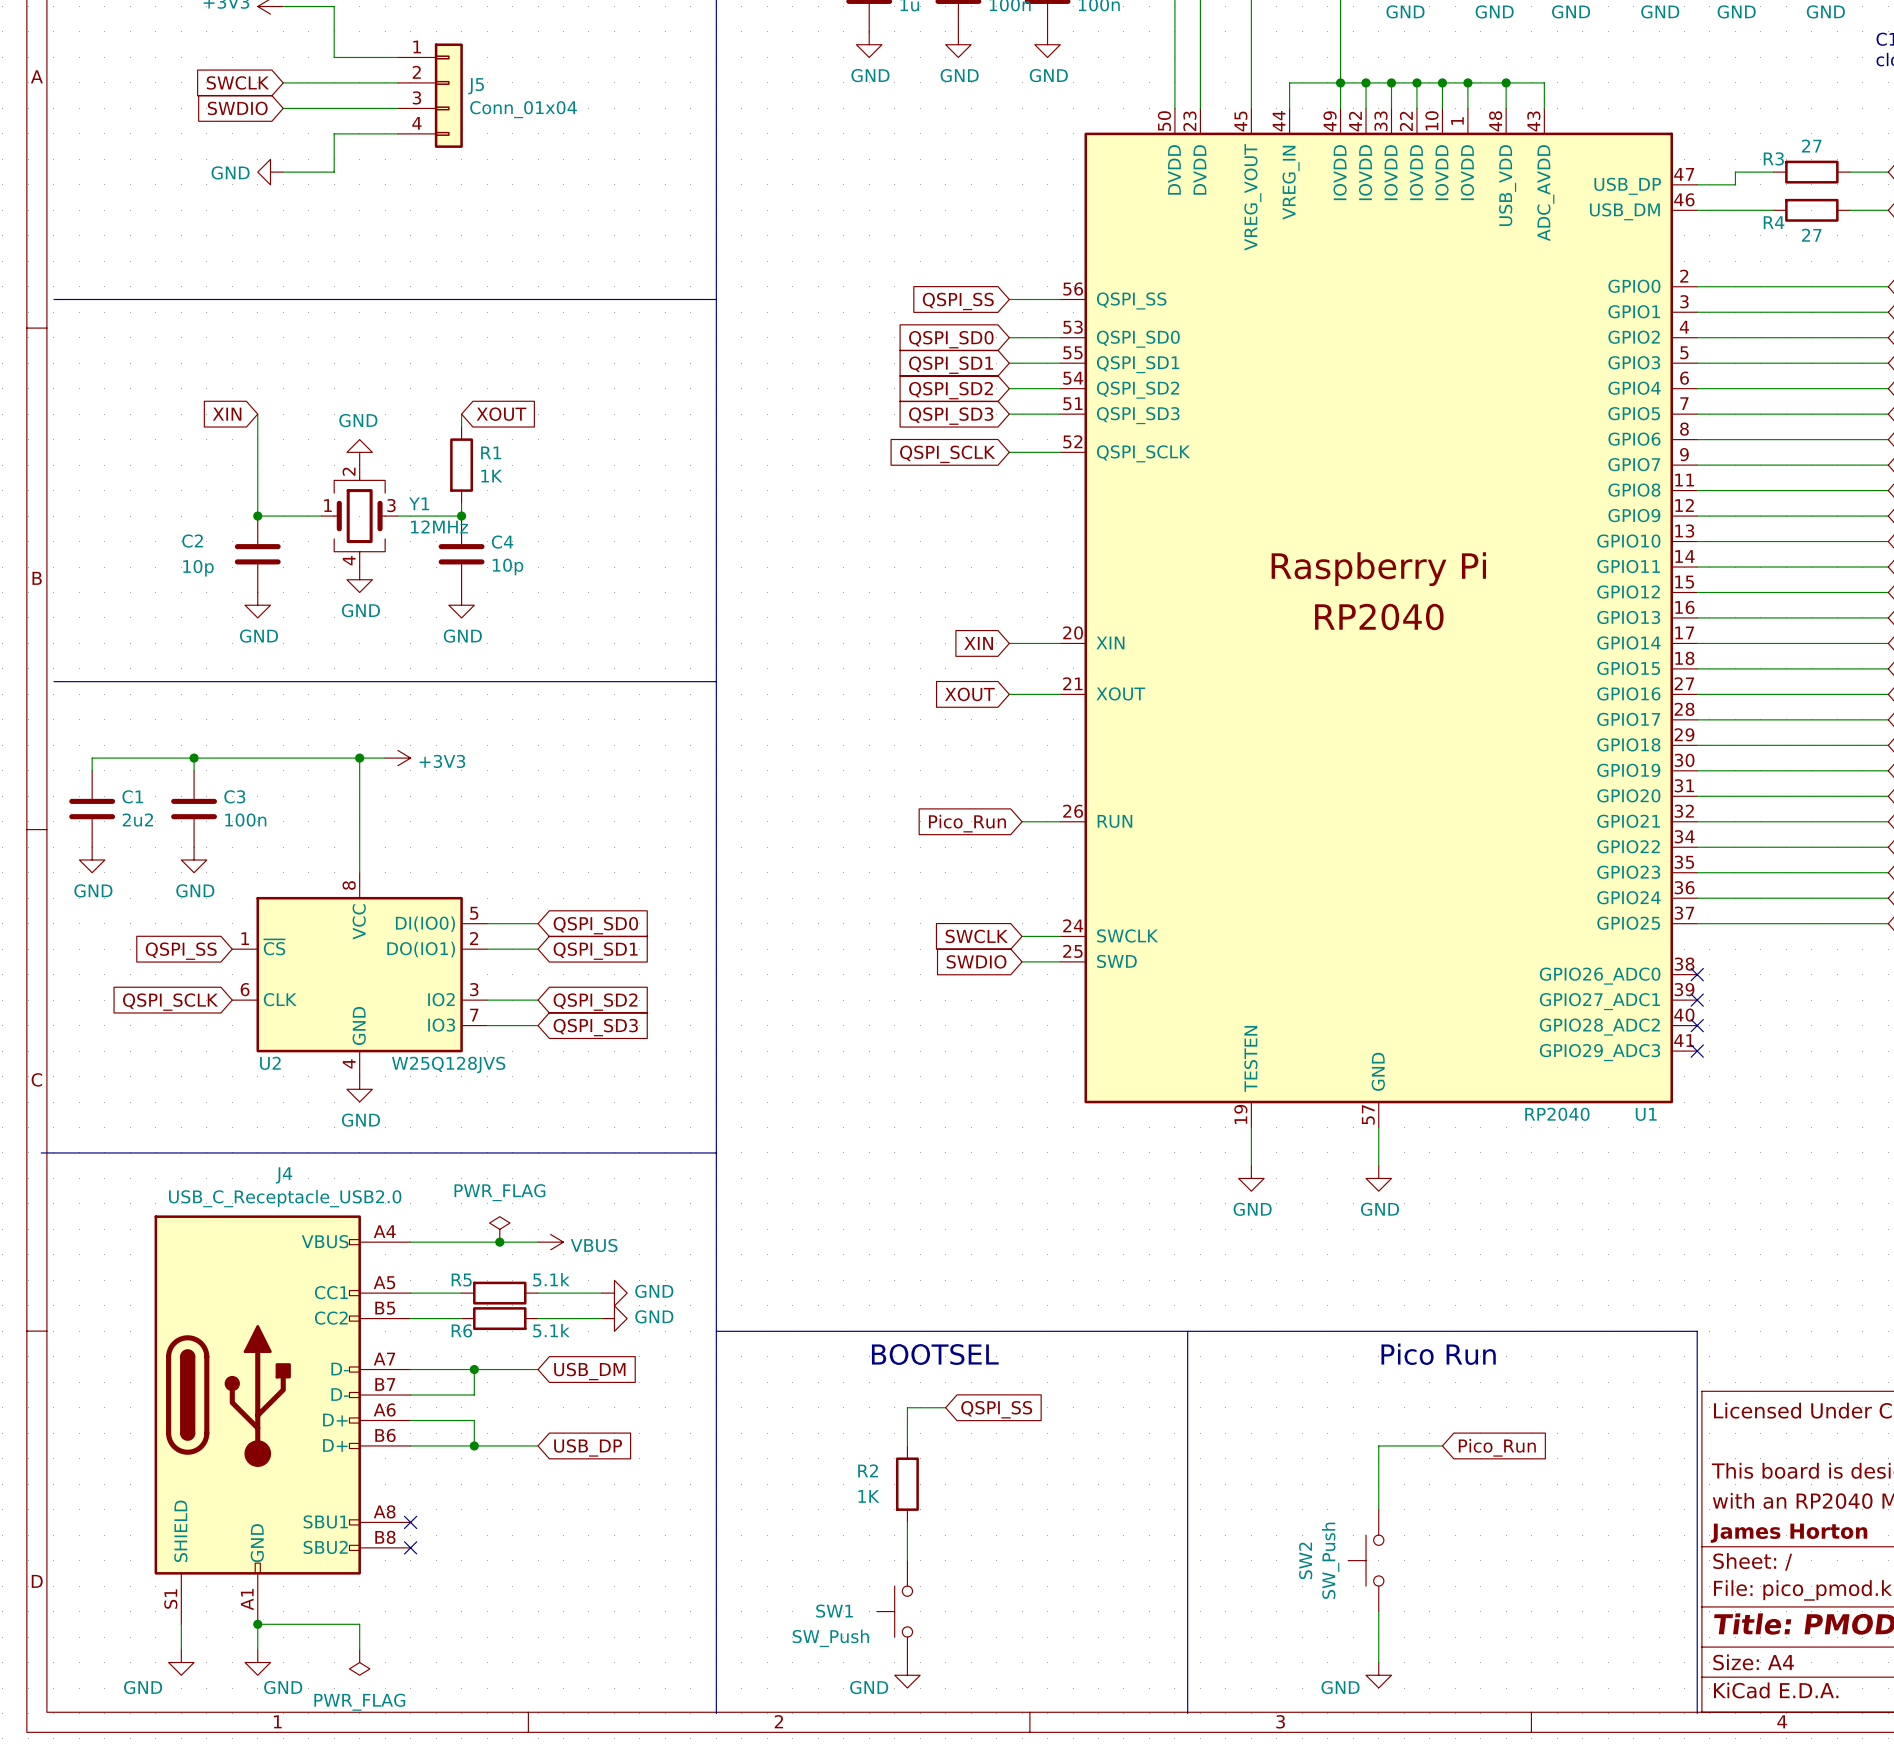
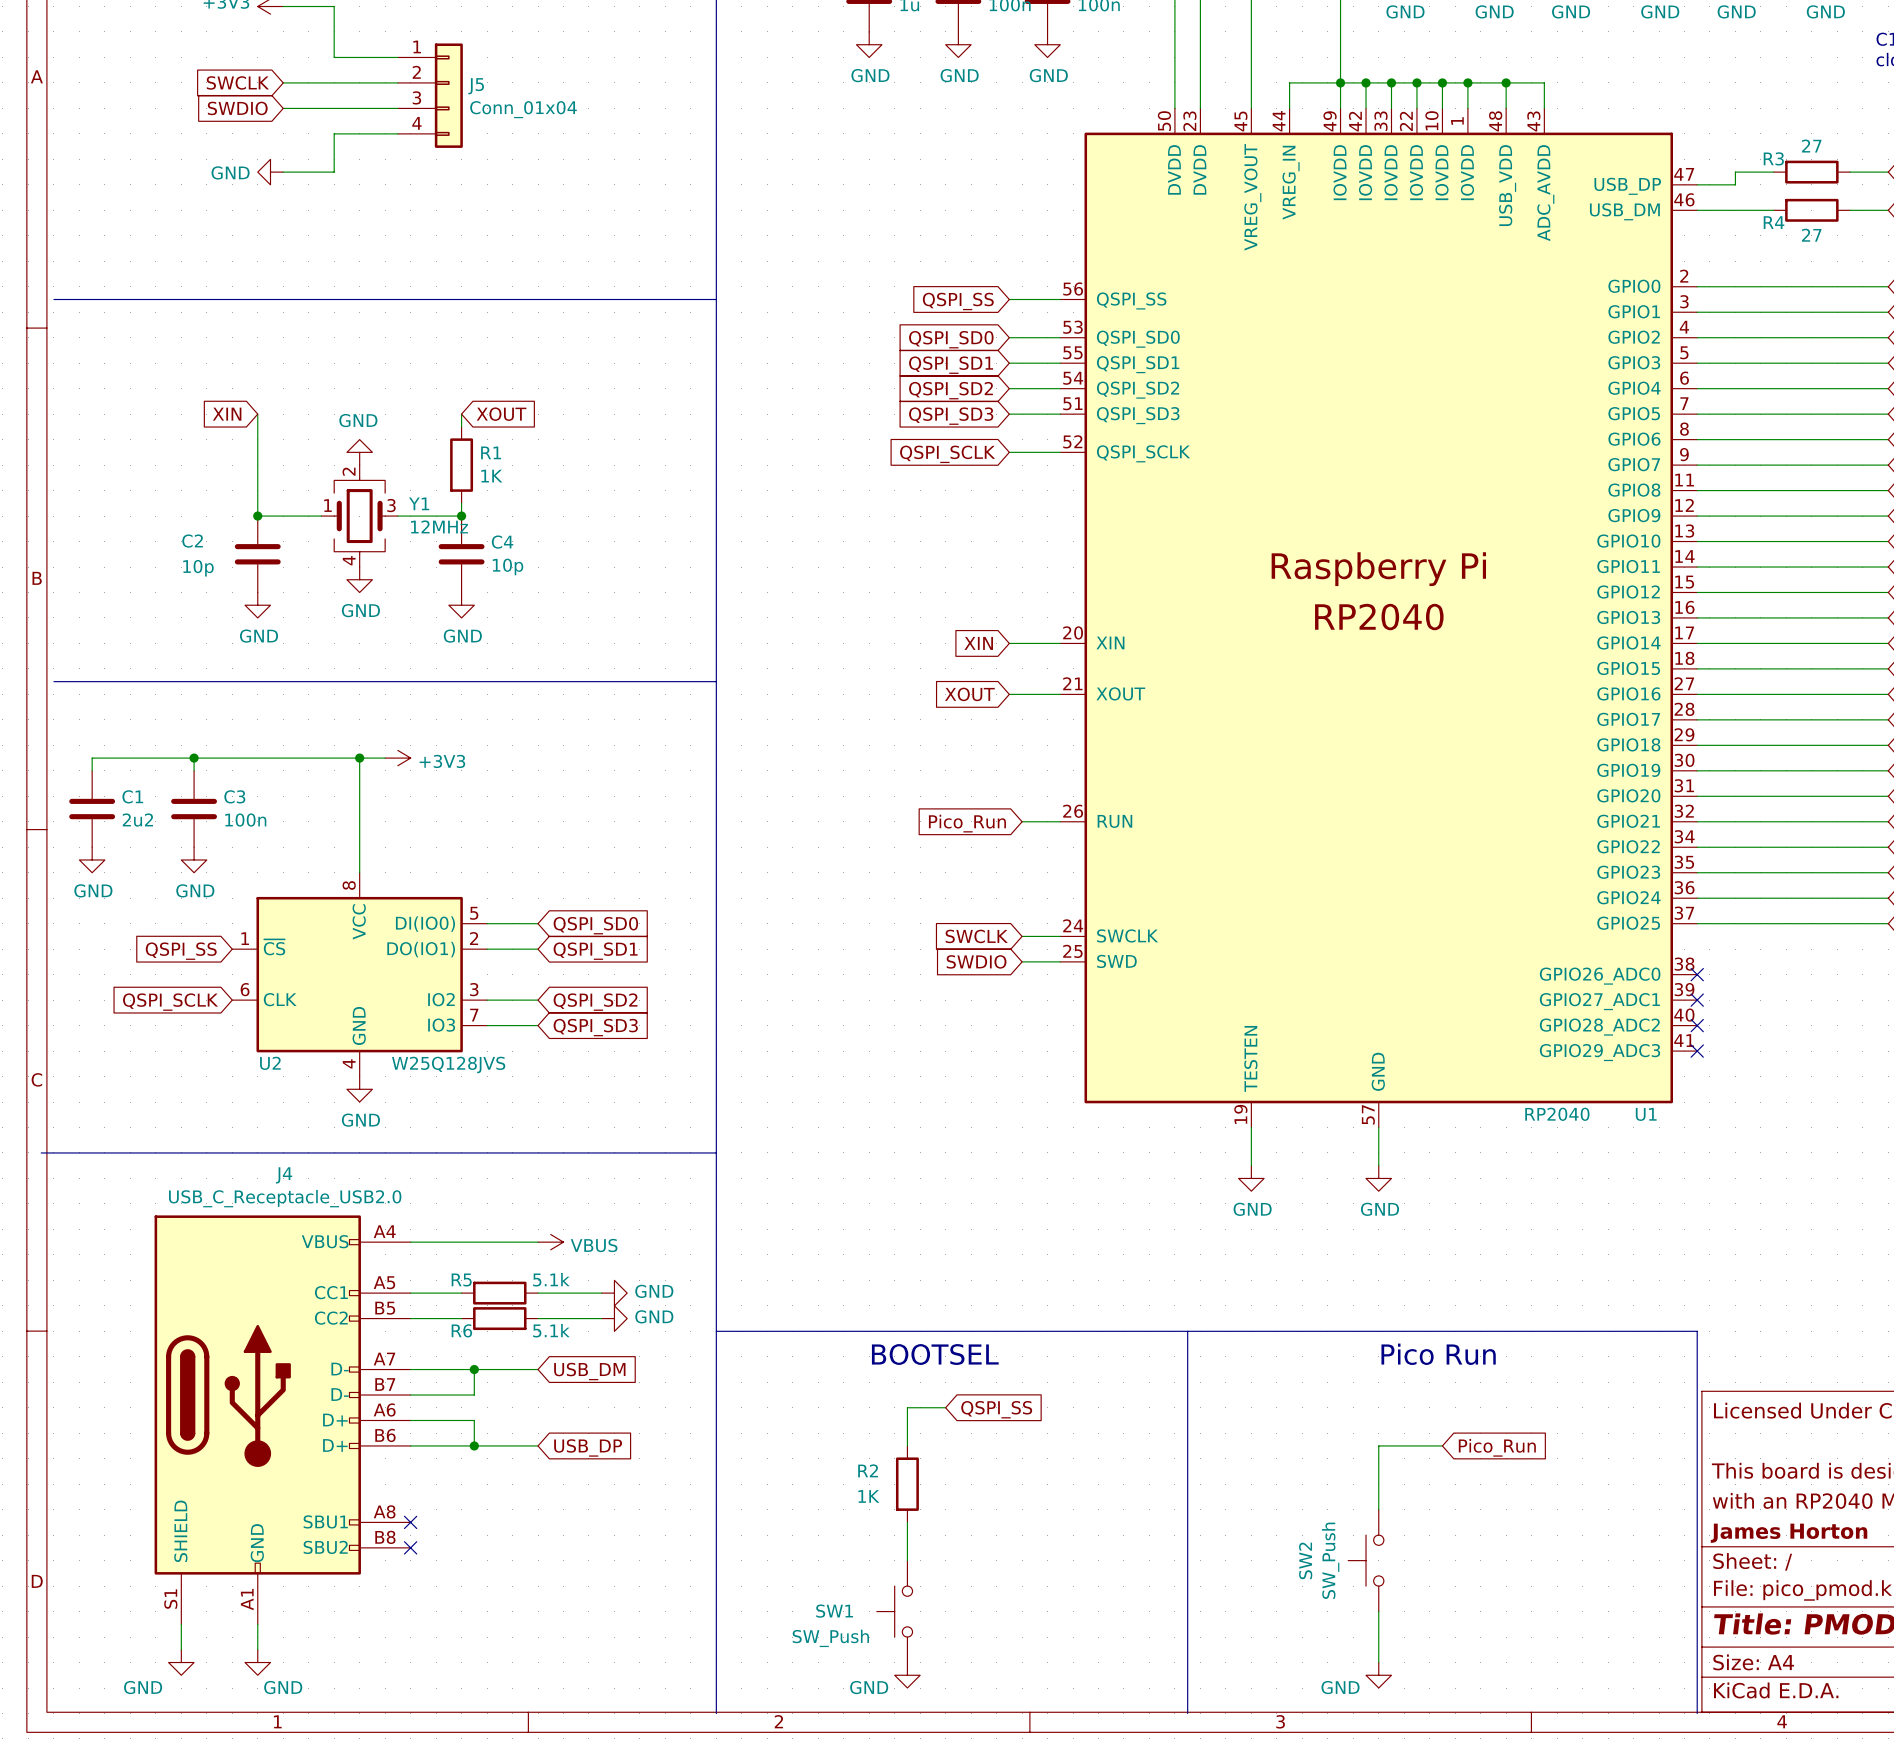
power symbol: PWR_FLAG (499, 1229) -> none
junction: (499, 1242) -> none
wire: (257, 1624) (359, 1624) (359, 1649) -> none
junction: (257, 1624) -> none
power symbol: PWR_FLAG (359, 1662) -> none

